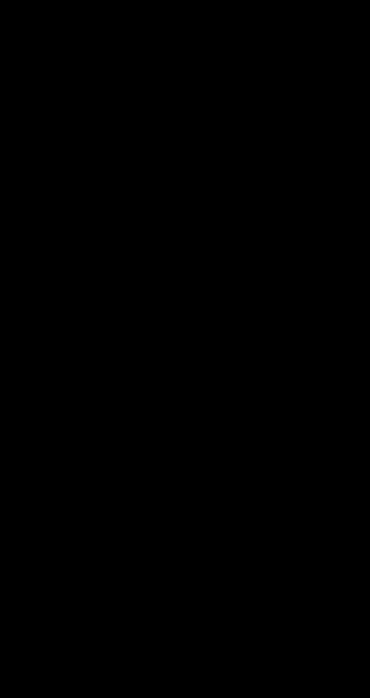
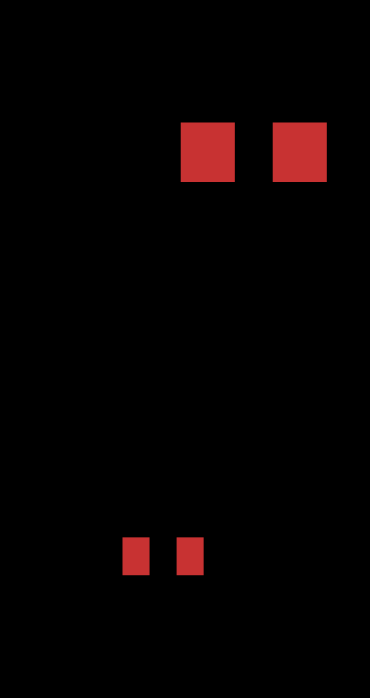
part: none -> (253, 152)
part: none -> (163, 556)

